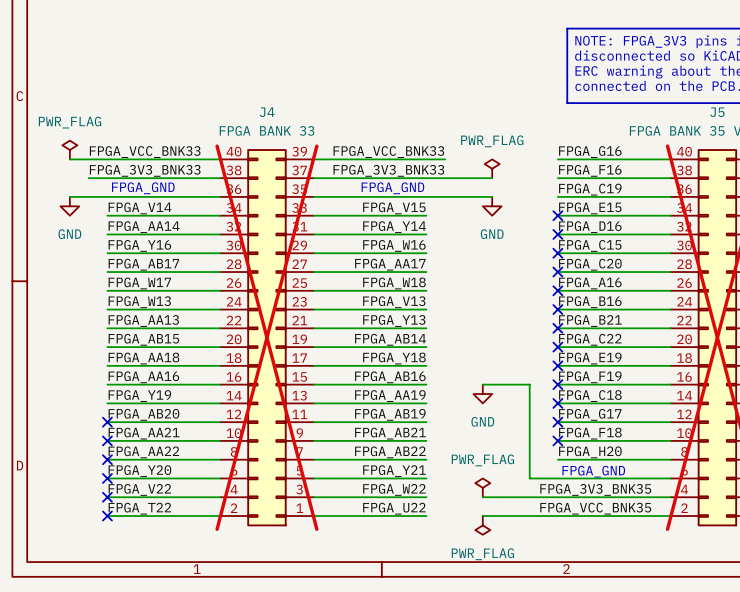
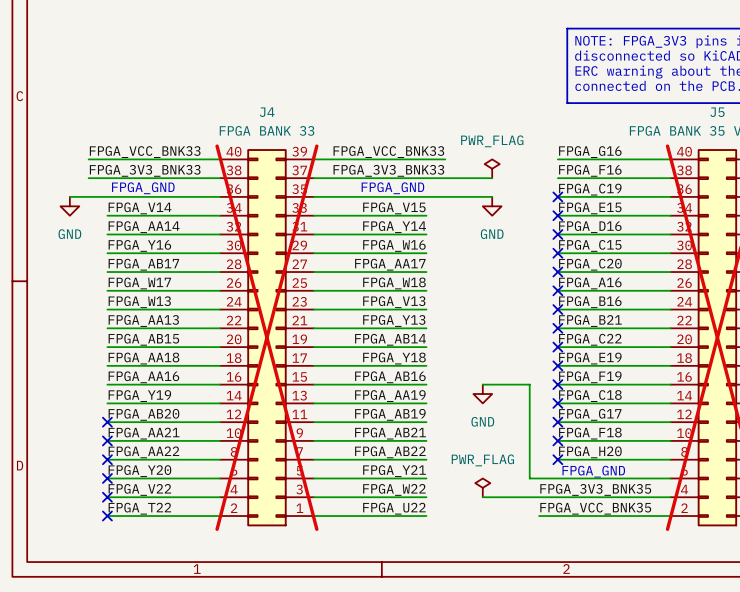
power symbol: PWR_FLAG (69, 150) -> none
wire: (69, 159) (88, 159) -> none
no-connect mark: none -> (557, 196)
no-connect mark: none -> (557, 459)
wire: (482, 516) (539, 516) -> none
power symbol: PWR_FLAG (482, 525) -> none

